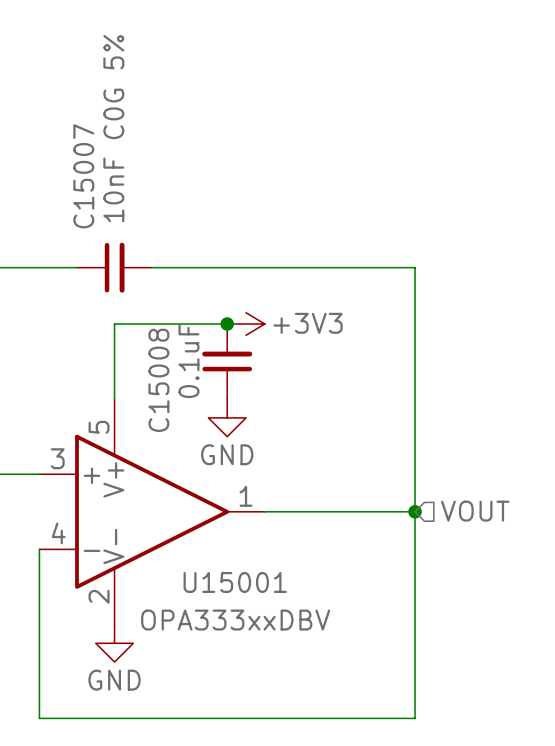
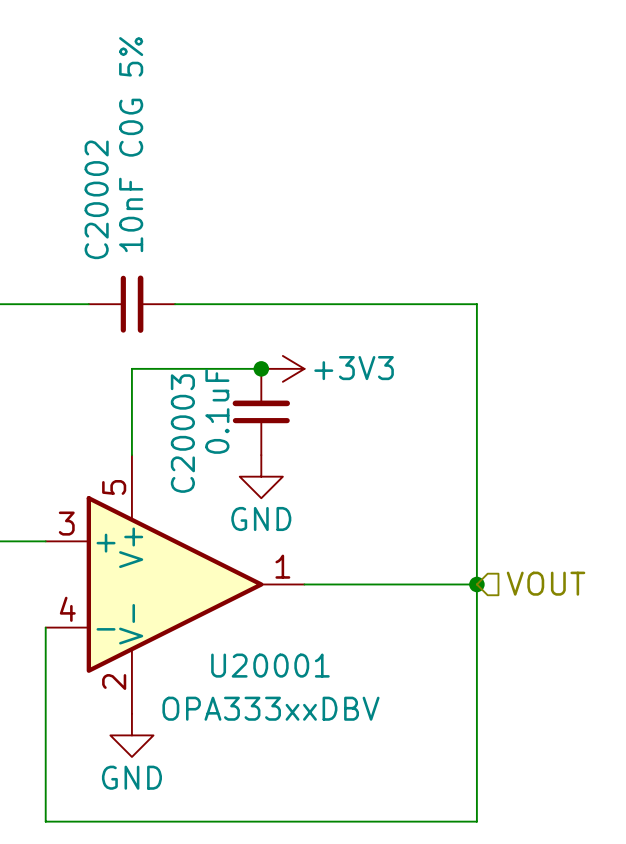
C15007 name: C15007 (83, 176) -> C20002 (96, 199)
C15008 name: C15008 (158, 380) -> C20003 (182, 433)
U15001 name: U15001 (235, 582) -> U20001 (270, 665)

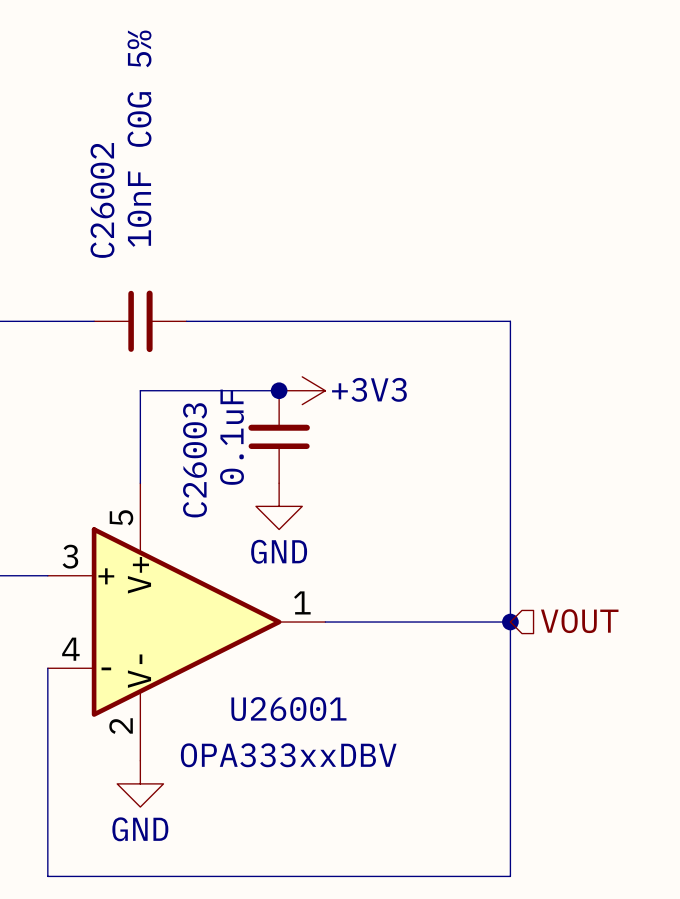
C20002 name: C20002 (96, 199) -> C26002 (102, 200)
C20003 name: C20003 (182, 433) -> C26003 (195, 460)
U20001 name: U20001 (270, 665) -> U26001 (288, 709)

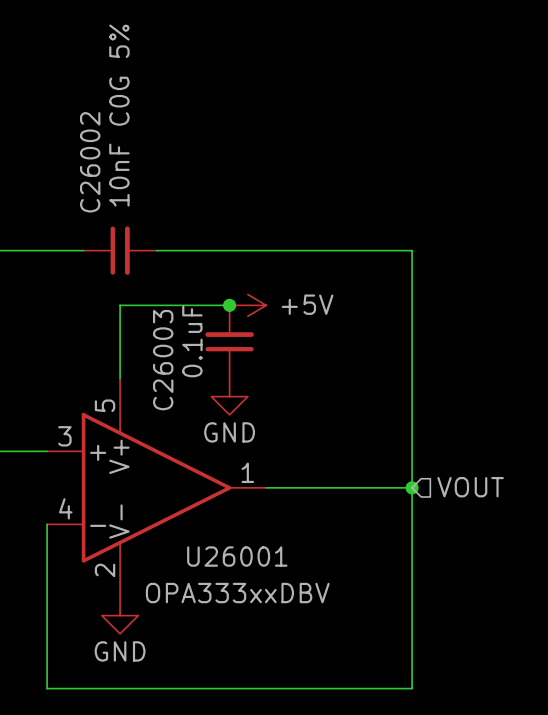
power symbol: +3V3 (302, 390) -> +5V (247, 305)

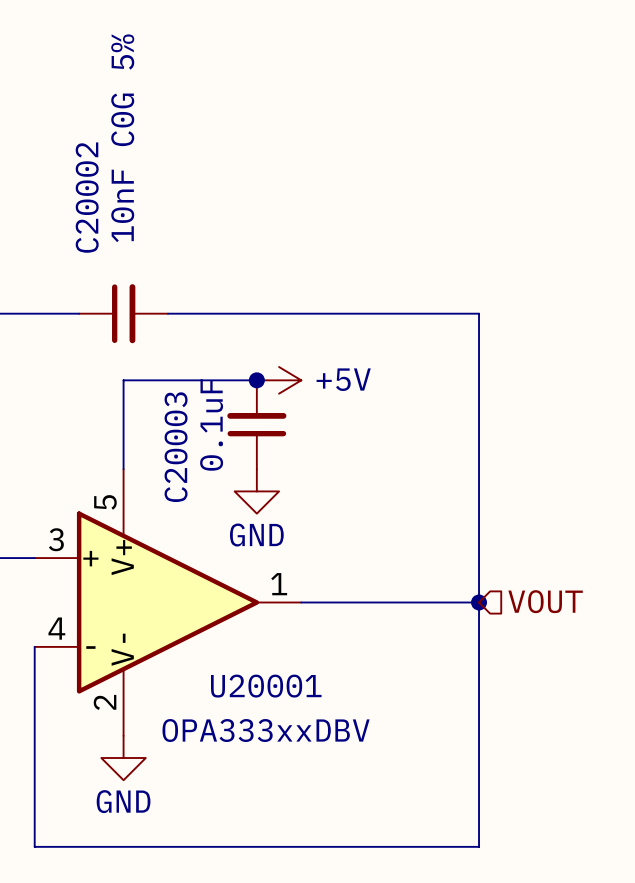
C26002 name: C26002 (90, 162) -> C20002 (87, 197)
C26003 name: C26003 (163, 360) -> C20003 (176, 447)
U26001 name: U26001 (237, 556) -> U20001 (266, 686)

